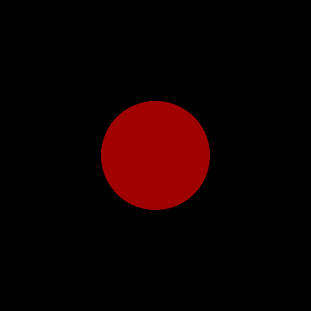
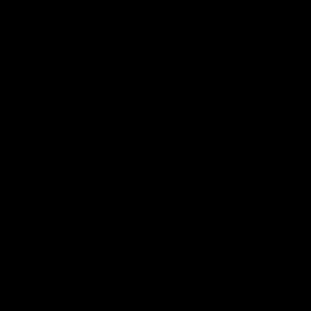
part: (155, 155) -> none

